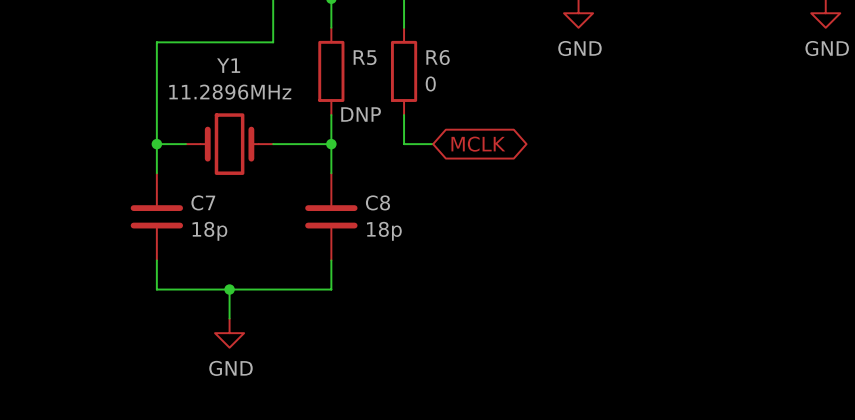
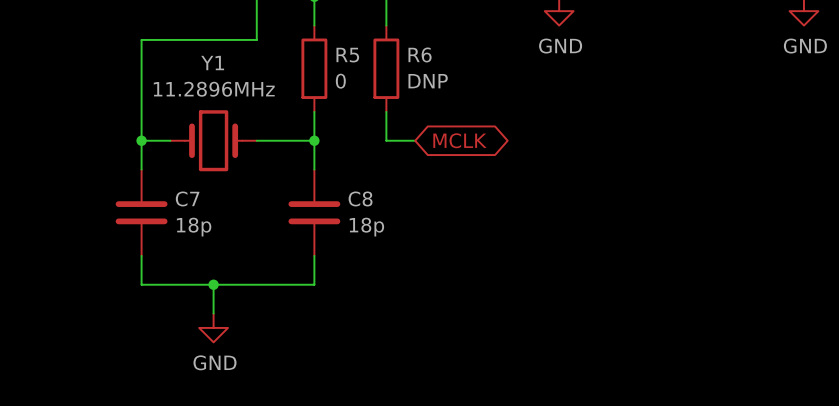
R5 value: none -> 0 (340, 81)
R6 value: 0 (430, 83) -> none
R6 text: none -> DNP (428, 81)
R5 text: DNP (361, 114) -> none

